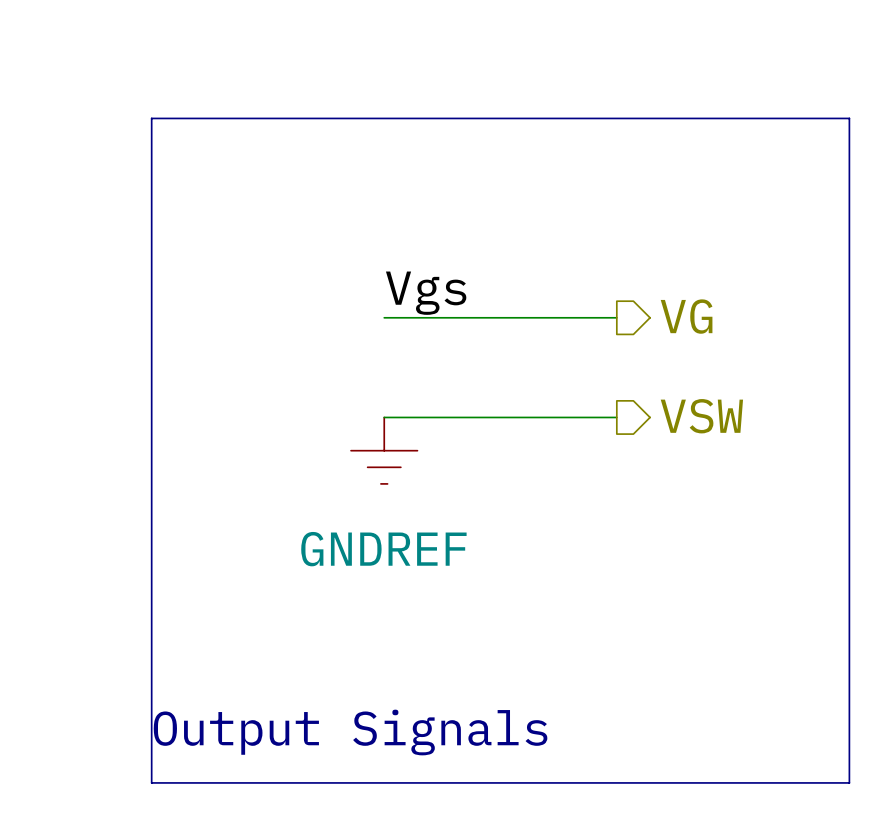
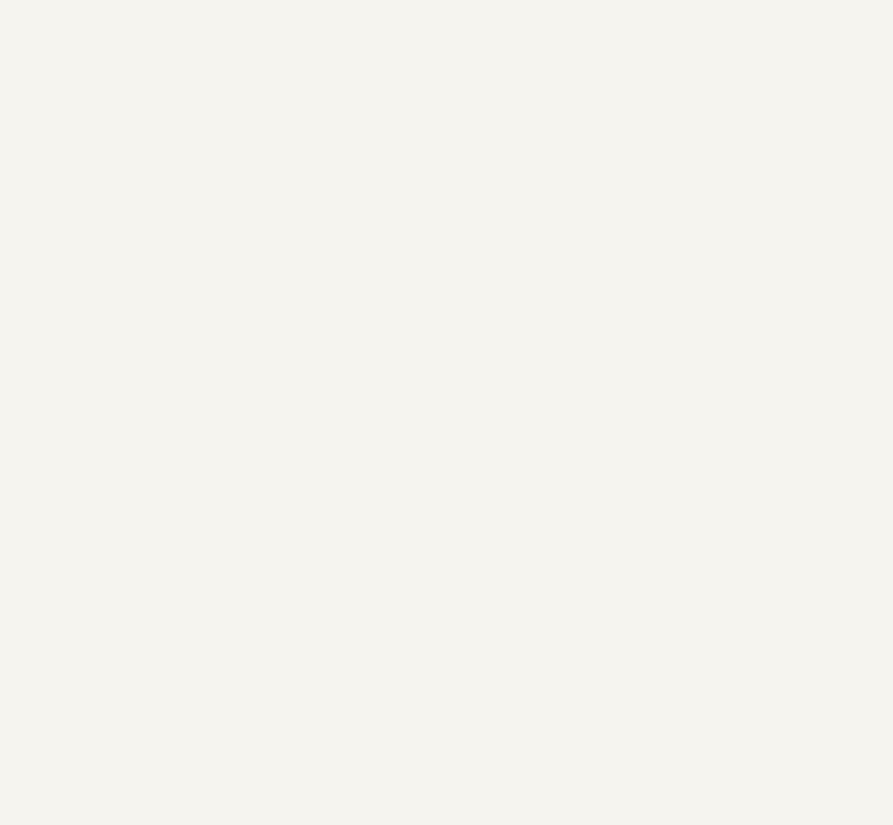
line: (151, 118) (849, 118) (849, 782) (151, 782) (151, 118) -> none
label: Vgs (426, 293) -> none
hierarchical label: VG (686, 316) -> none
wire: (384, 317) (616, 317) -> none
hierarchical label: VSW (701, 416) -> none
wire: (384, 417) (616, 417) -> none
power symbol: GNDREF (384, 450) -> none
text: Output Signals (350, 732) -> none

